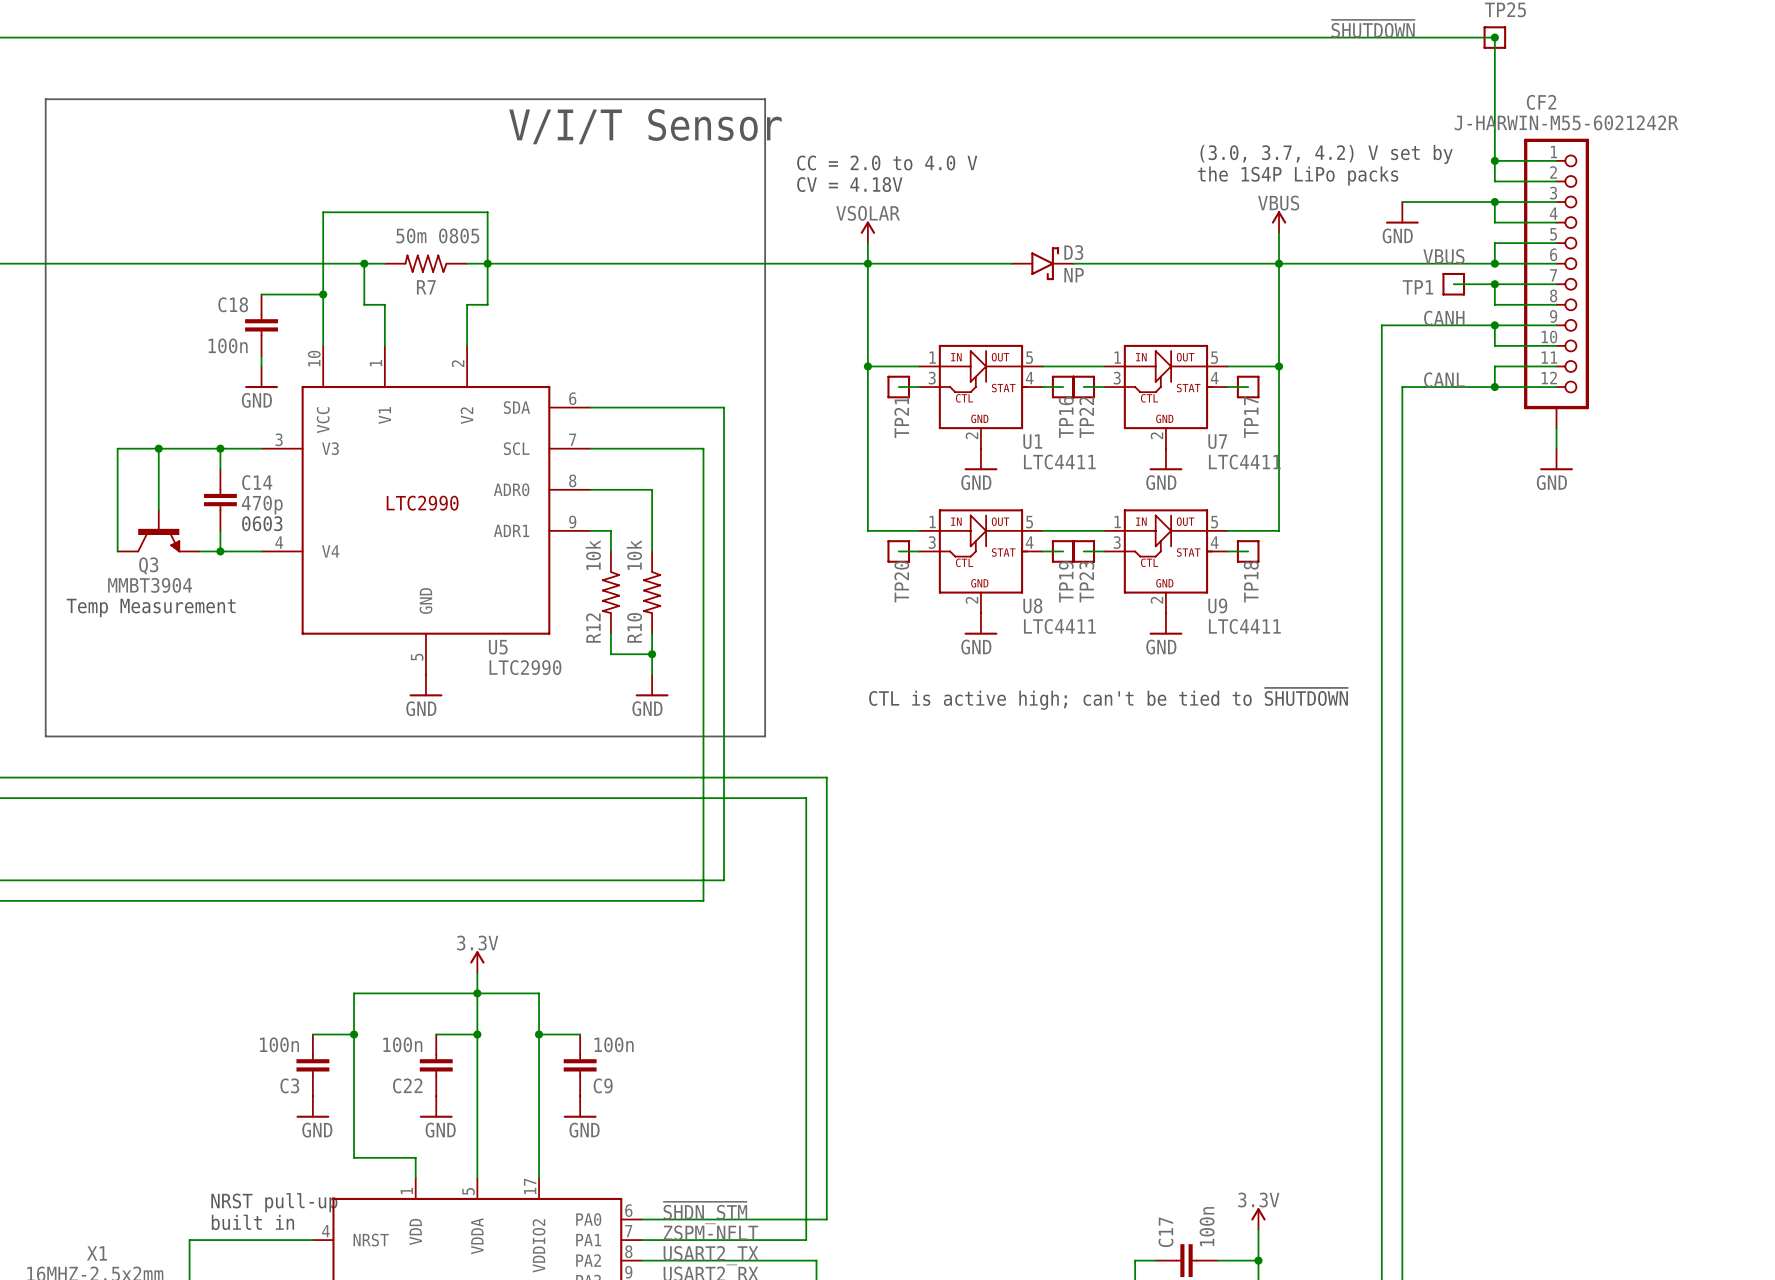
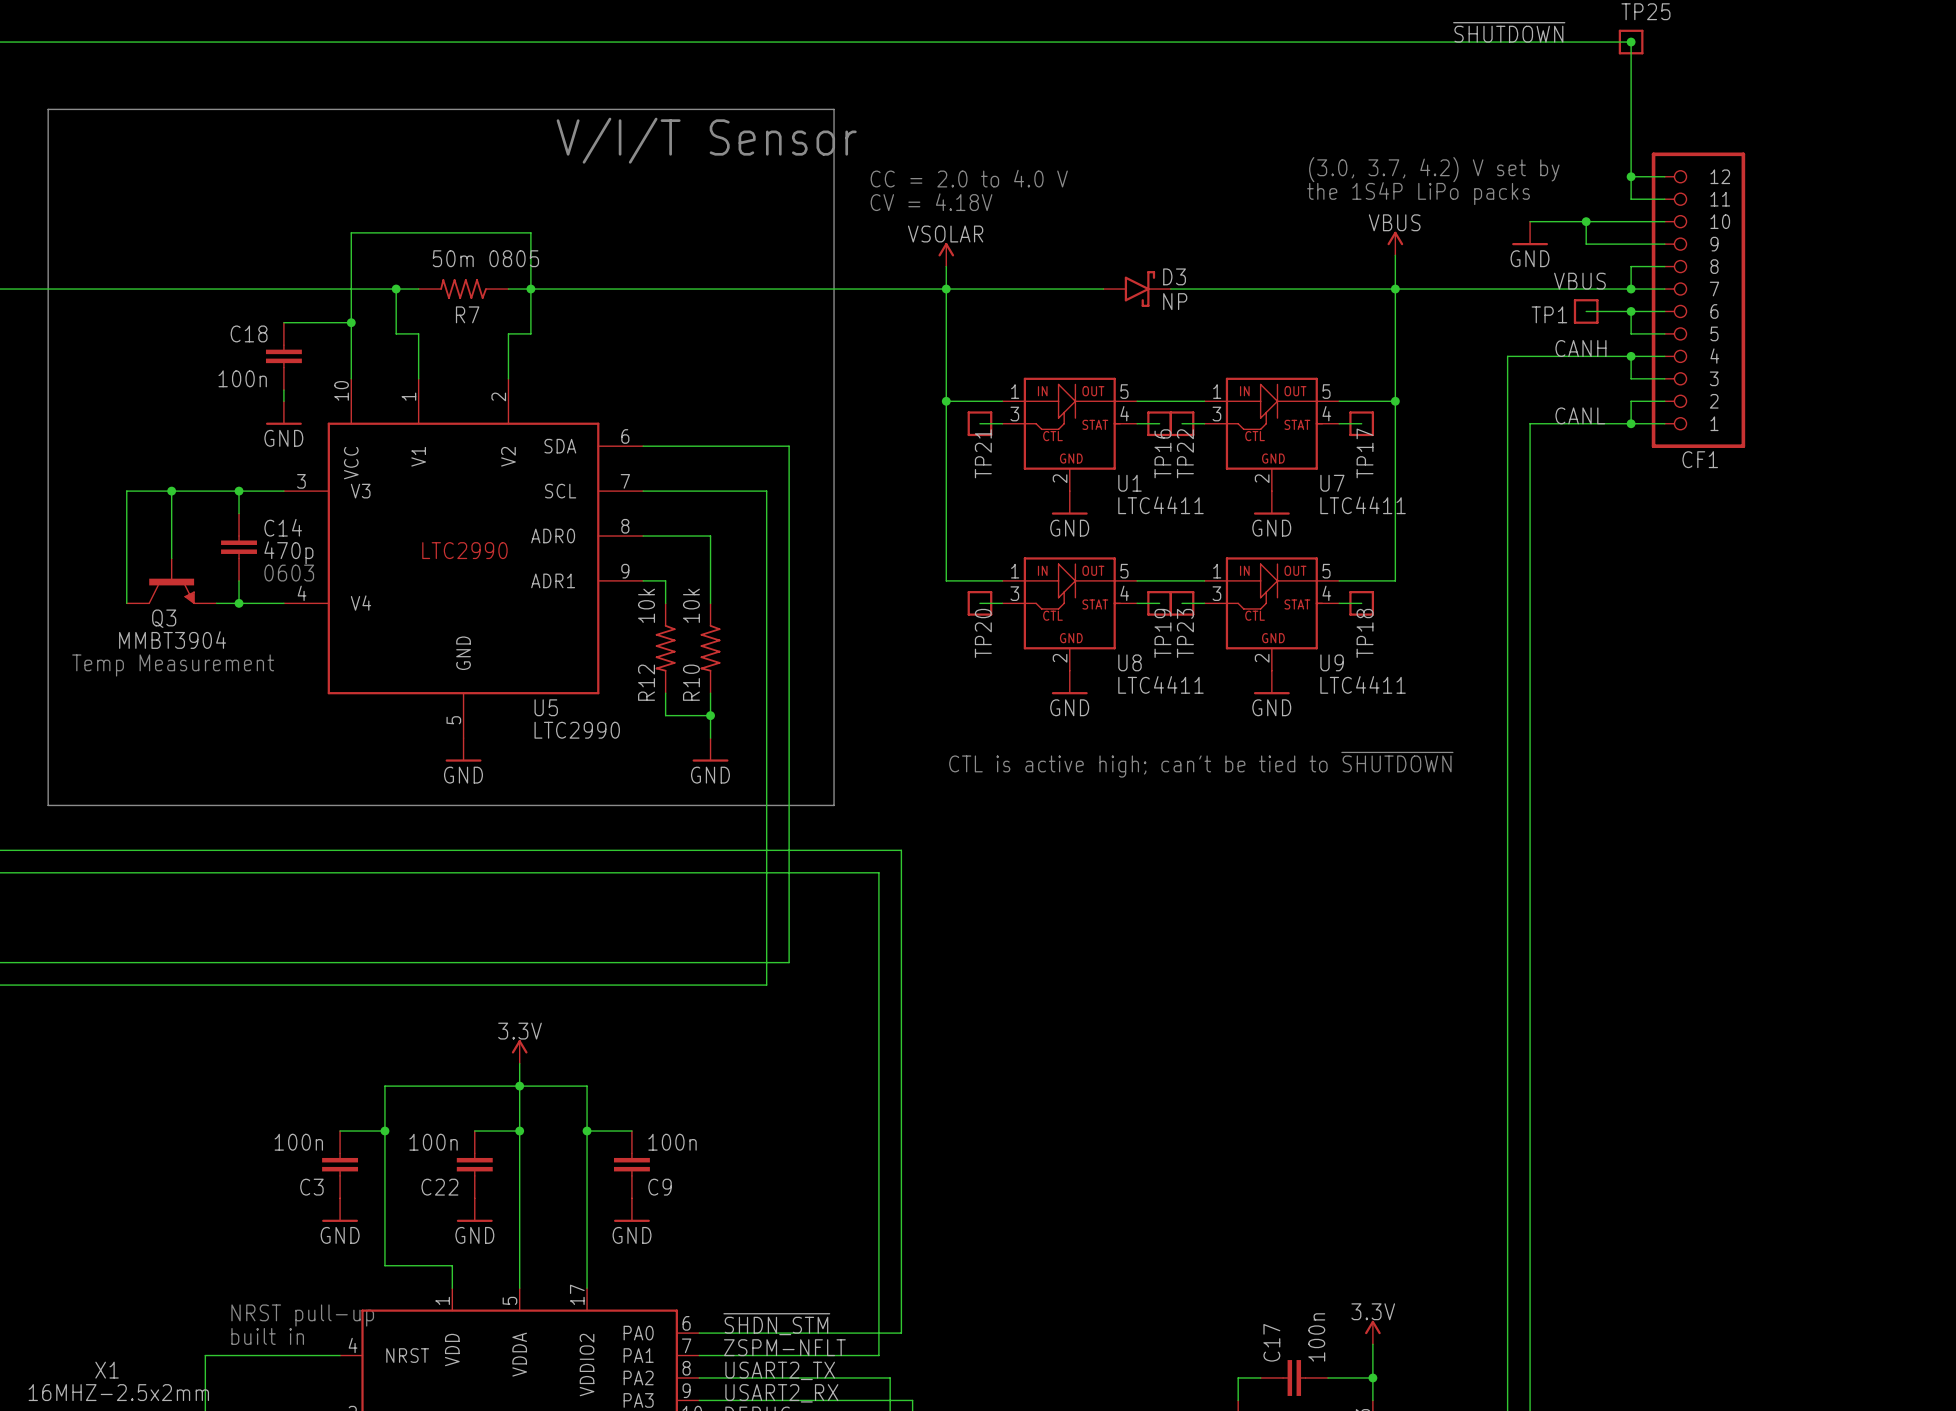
wire: (1525, 160) (1556, 160) -> none
wire: (1525, 181) (1556, 181) -> none
wire: (1494, 202) (1494, 222) -> (1586, 221) (1586, 244) (1631, 244)
junction position: (1494, 202) -> (1586, 221)
wire: (1525, 202) (1556, 202) -> none
wire: (1525, 222) (1556, 222) -> none
wire: (1525, 243) (1556, 243) -> none
wire: (1525, 263) (1556, 263) -> none
CF1: none -> (1698, 300)
CF2: J-HARWIN-M55-6021242R (1556, 283) -> none
wire: (1525, 284) (1556, 284) -> none
wire: (1525, 304) (1556, 304) -> none
wire: (1525, 325) (1556, 325) -> none
wire: (1525, 345) (1556, 345) -> none
wire: (1525, 366) (1556, 366) -> none
wire: (1525, 387) (1556, 387) -> none
wire: (1556, 428) (1556, 448) -> none
power symbol: GND (1556, 459) -> none

